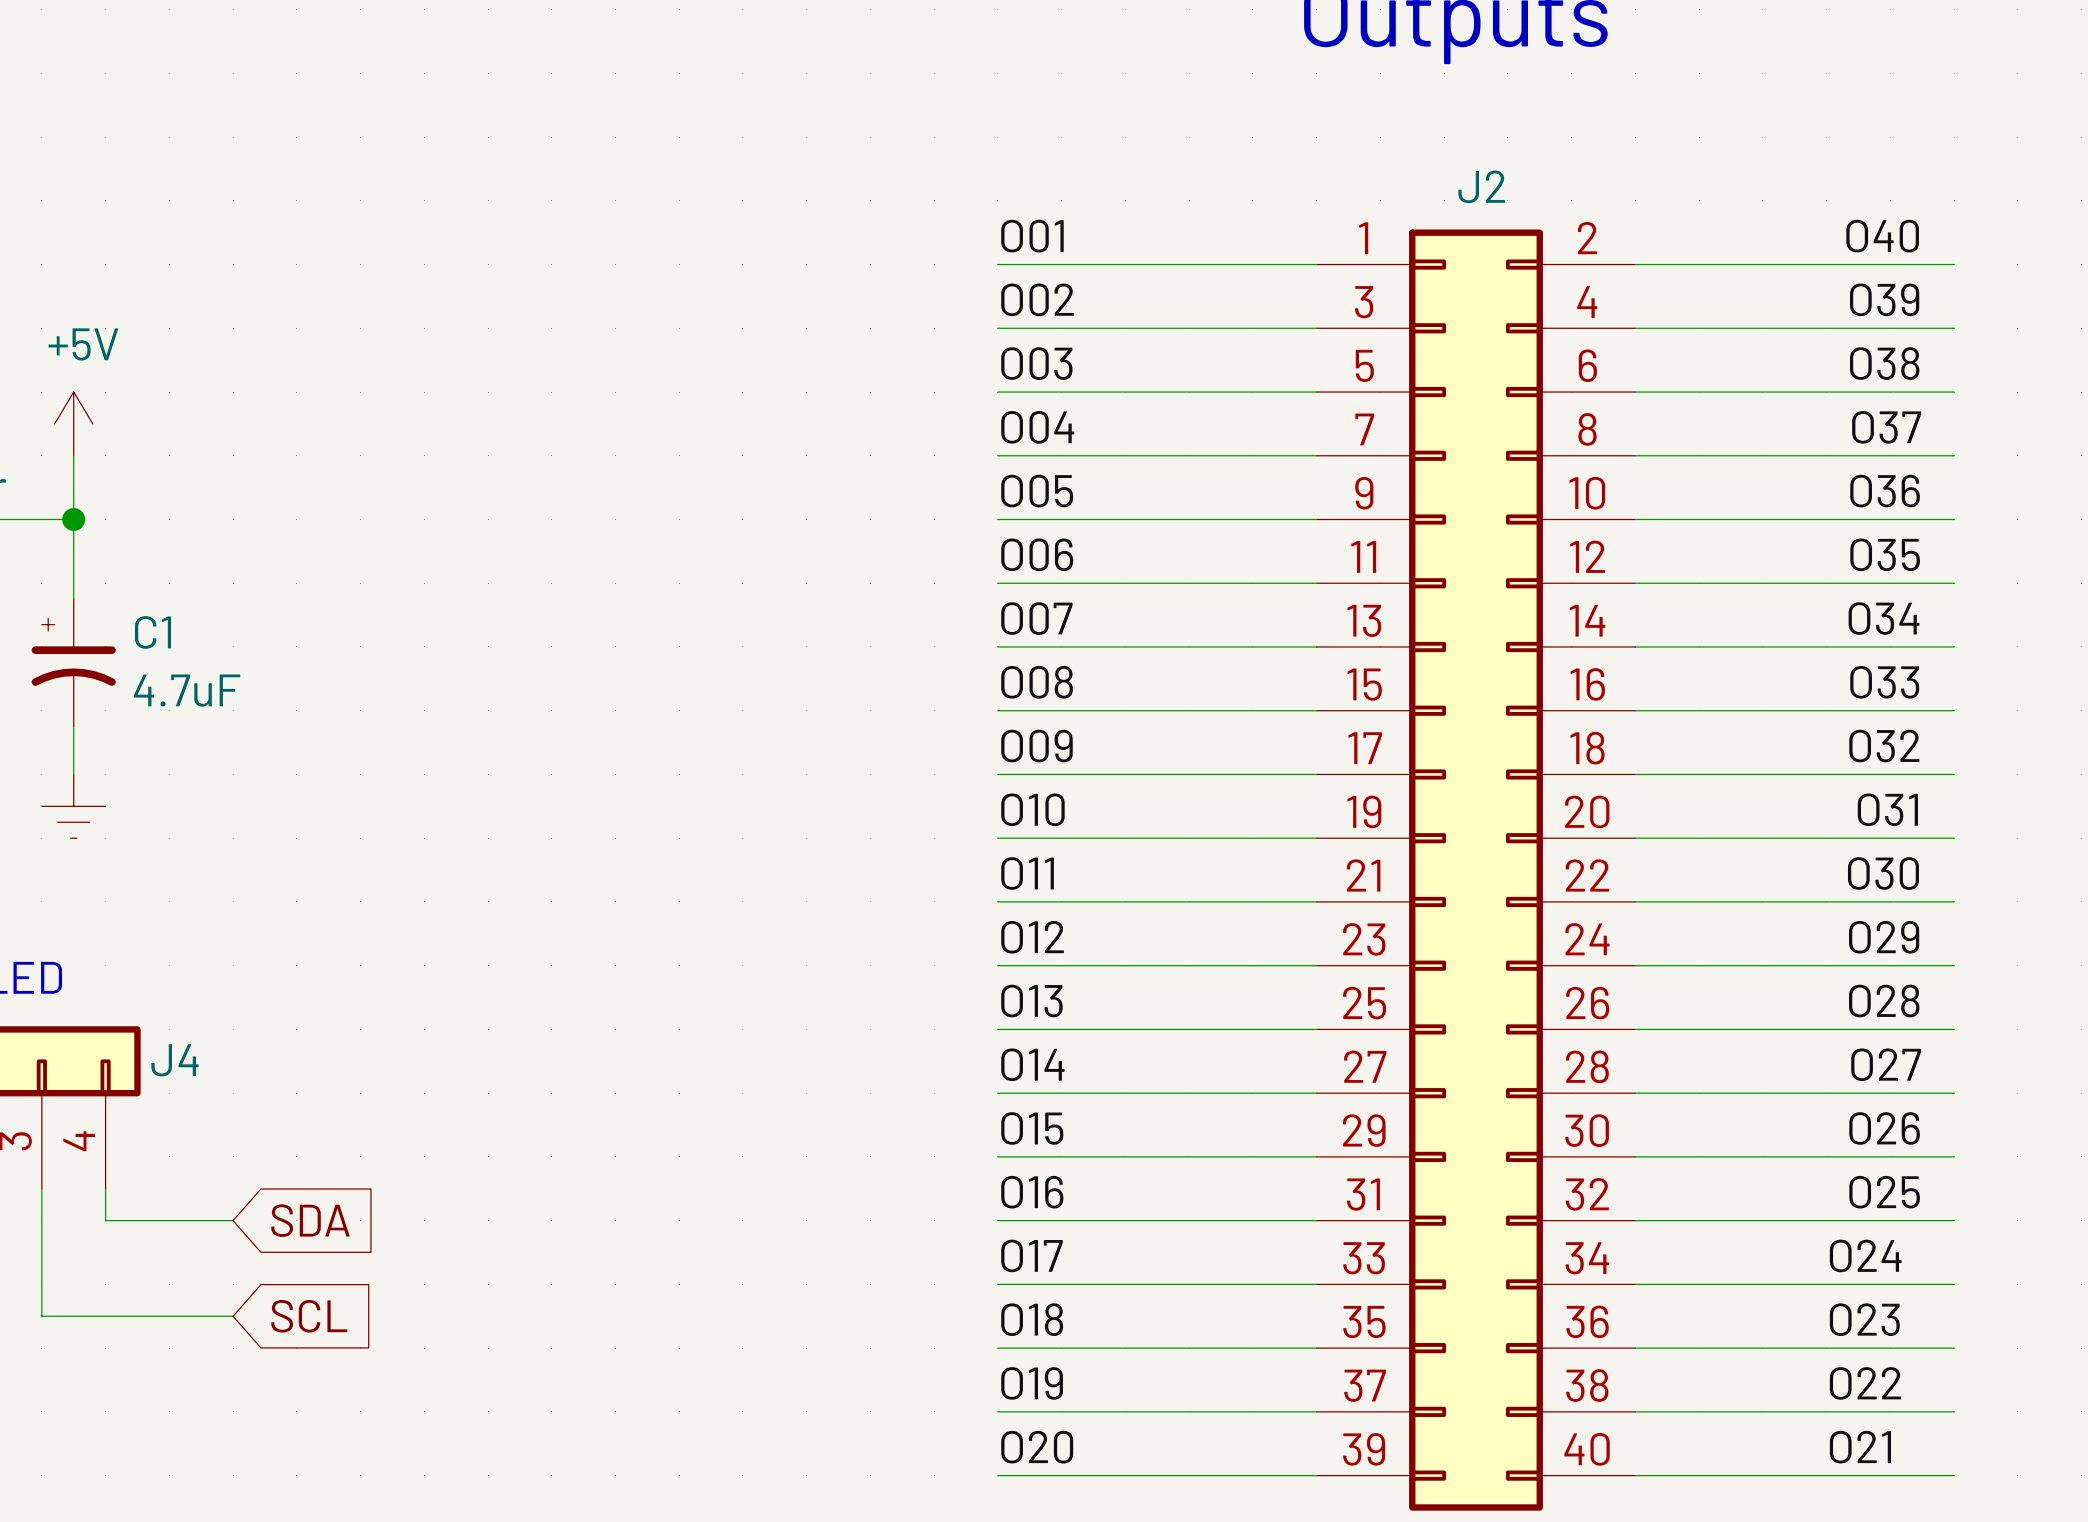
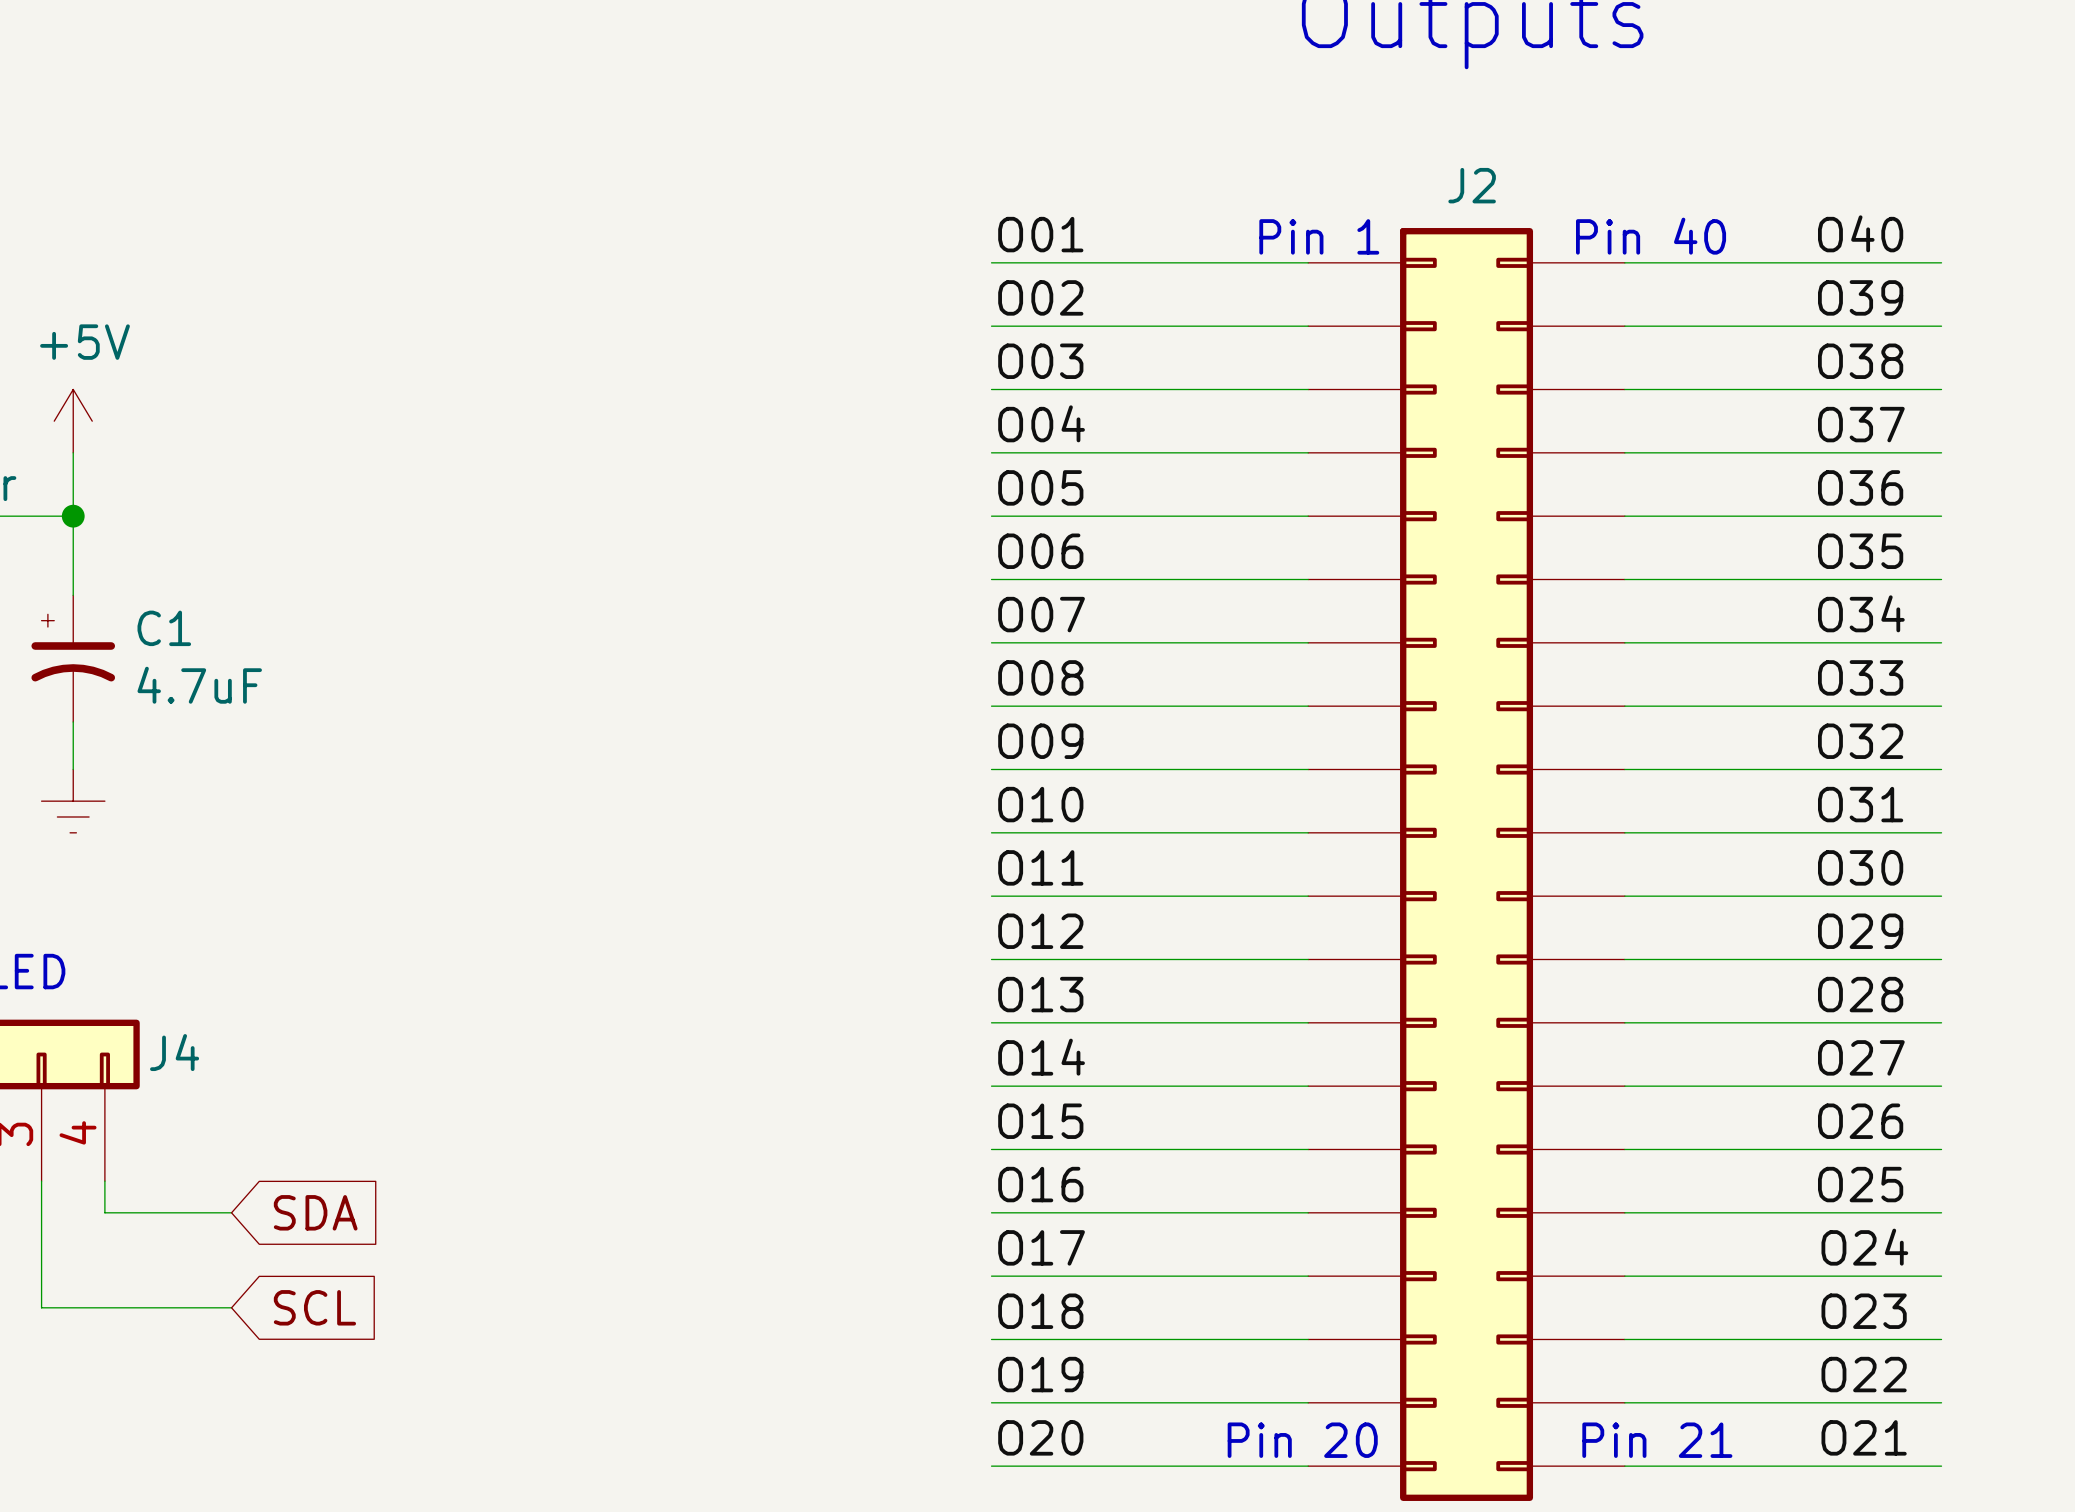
J2 symbol: [1316, 229, 1636, 1511] -> [1308, 228, 1625, 1501]
text: none -> Pin 1 (1319, 236)
text: none -> Pin 40 (1651, 236)
text: none -> Pin 20 (1302, 1440)
text: none -> Pin 21 (1657, 1440)

